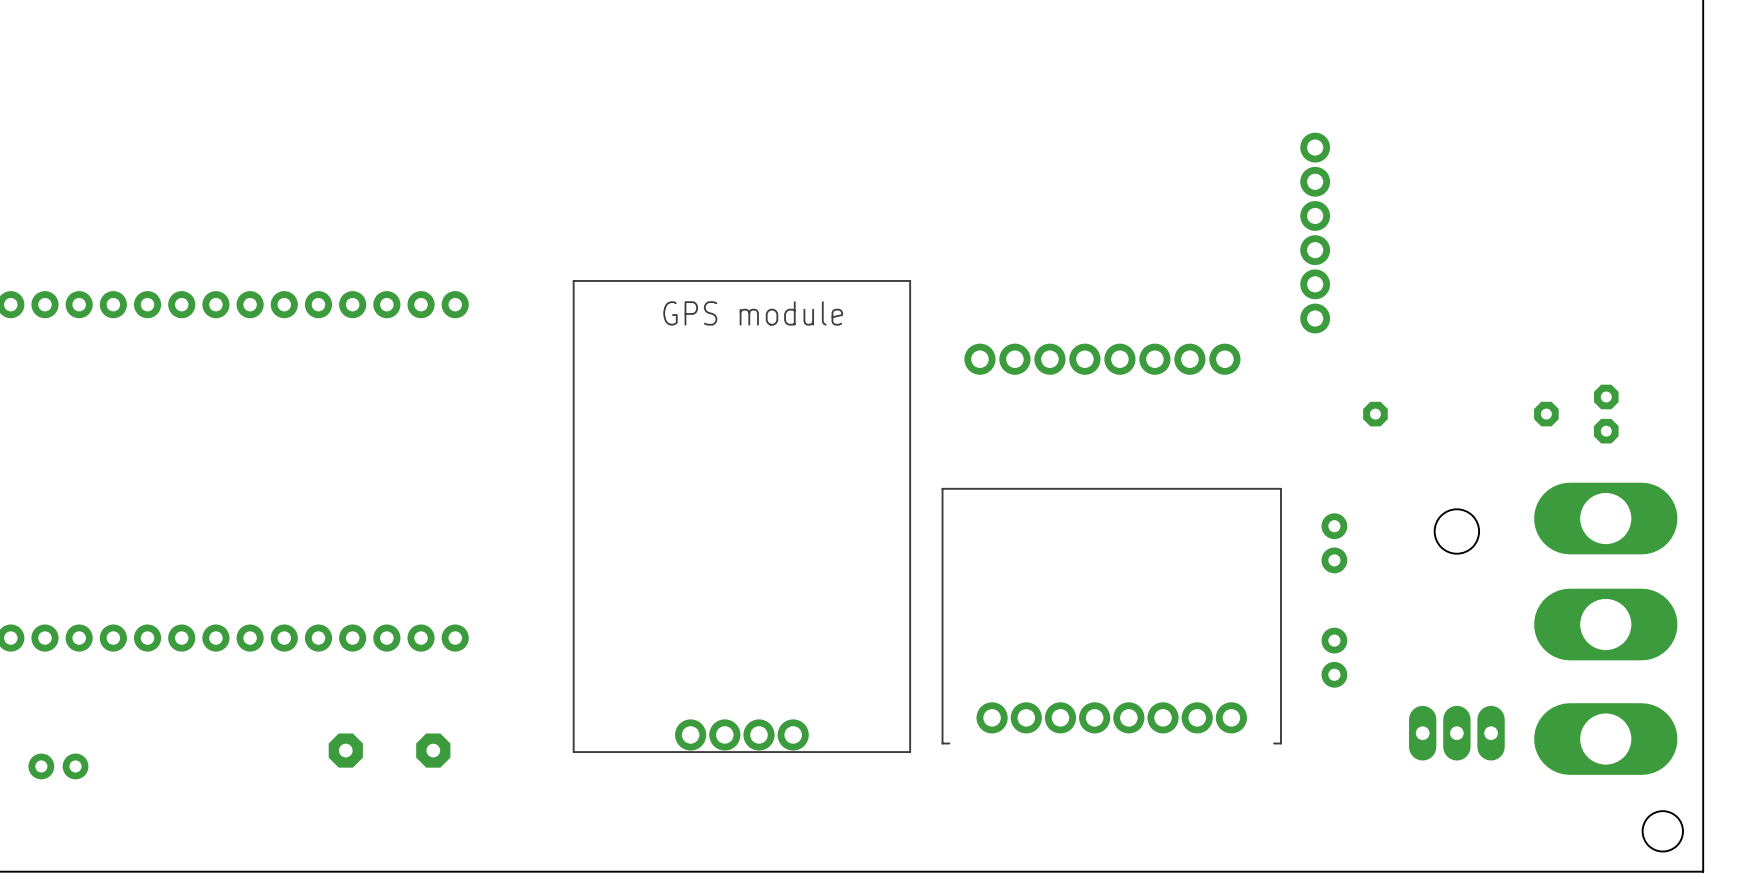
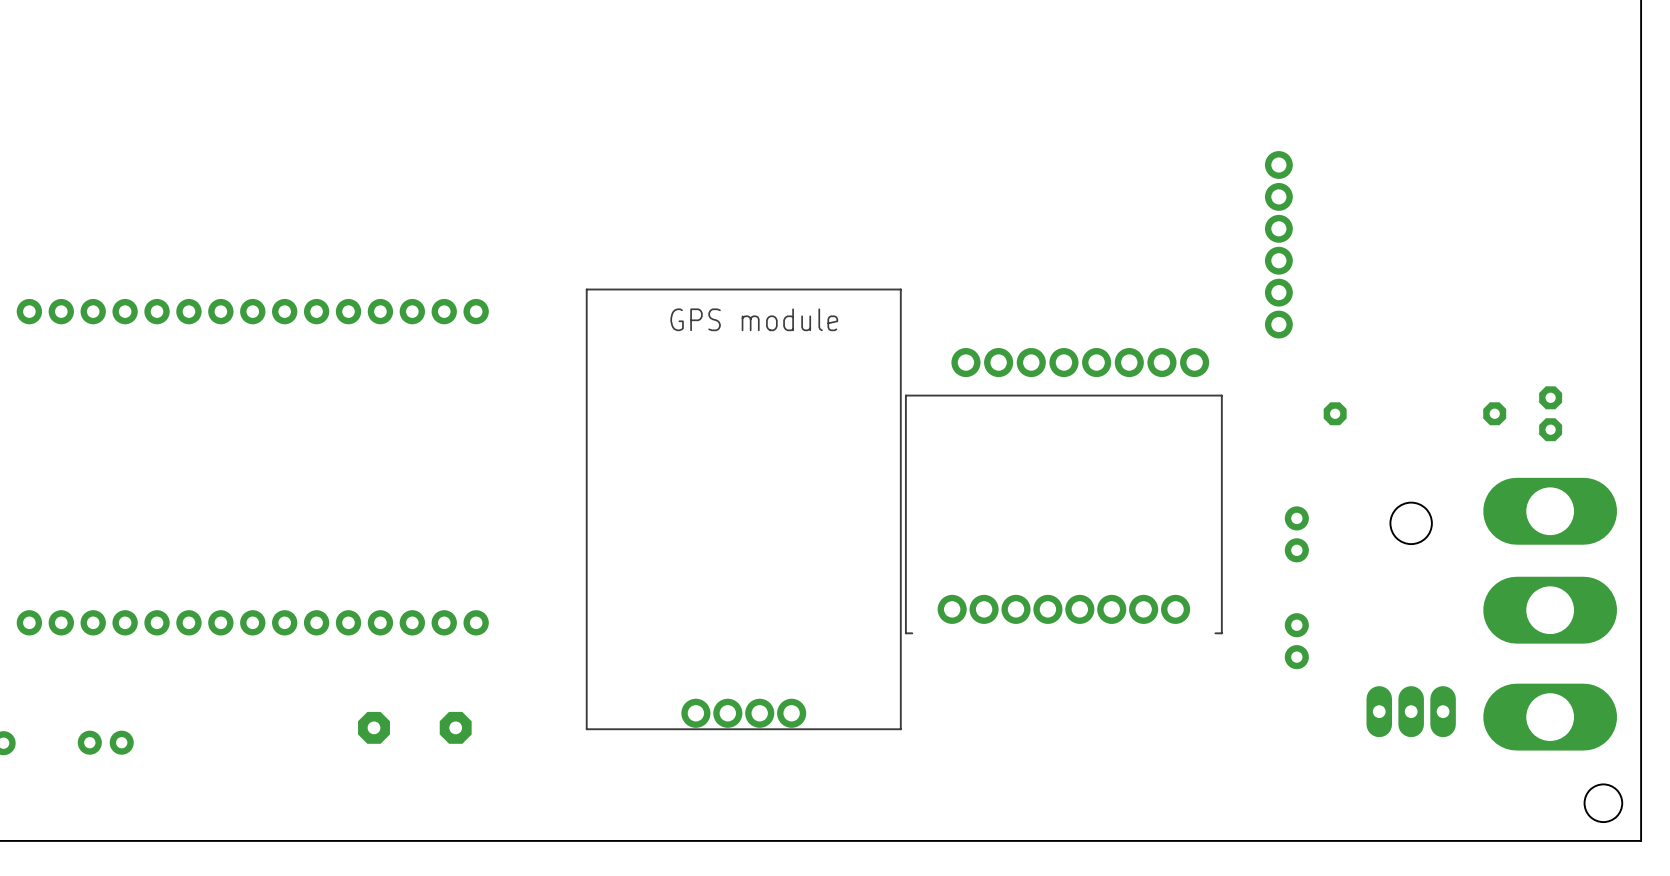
part position: (1111, 616) -> (1063, 514)

